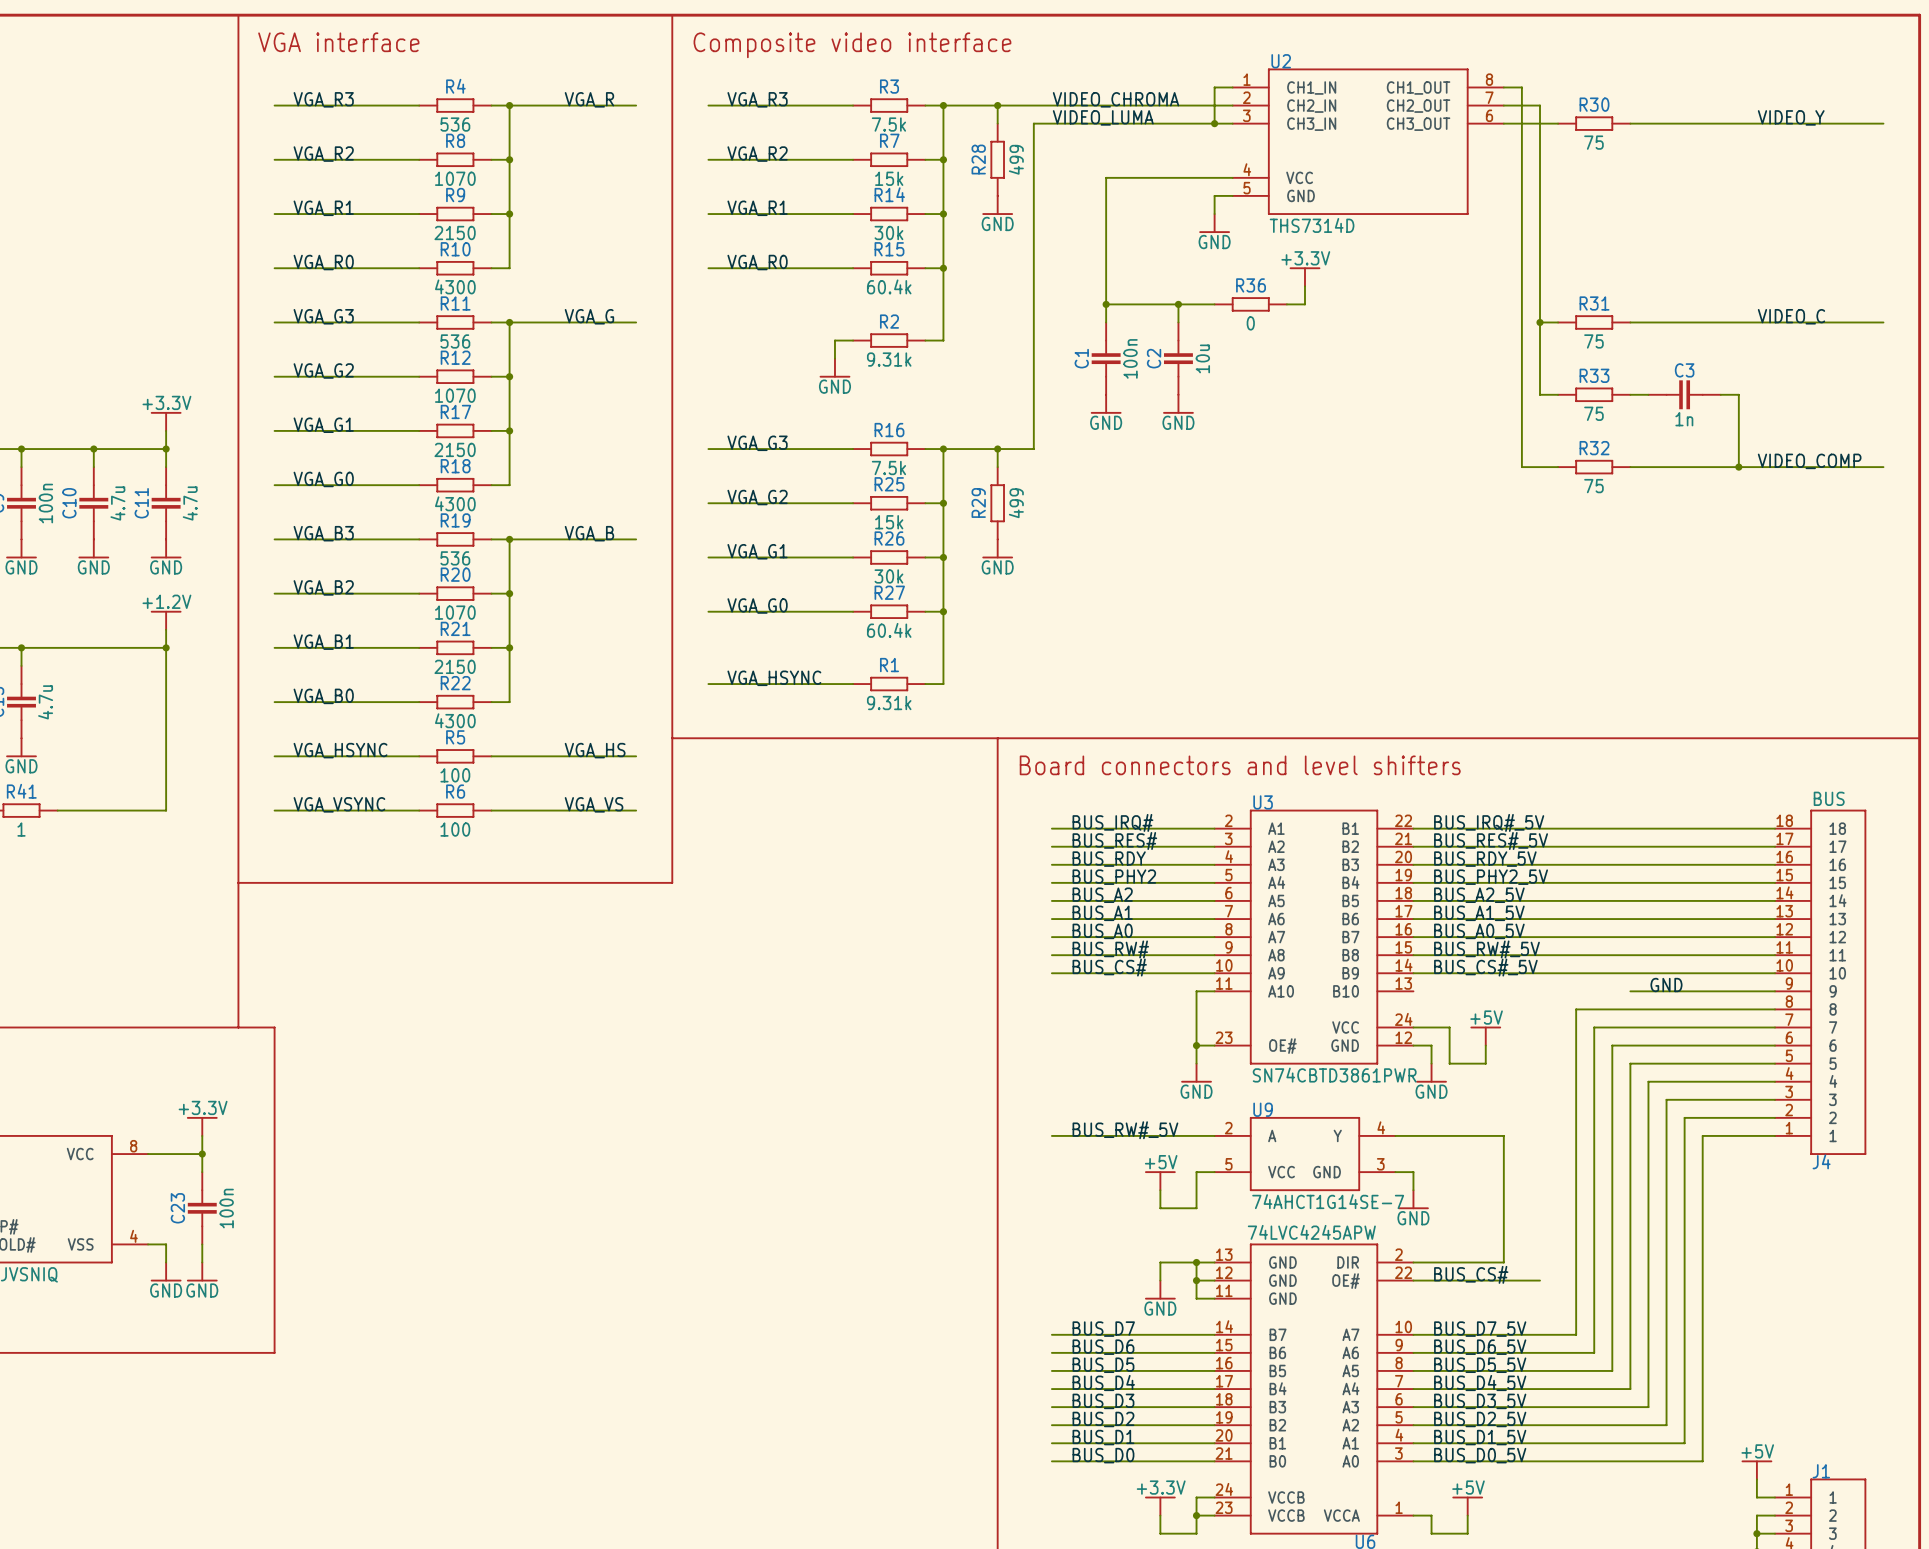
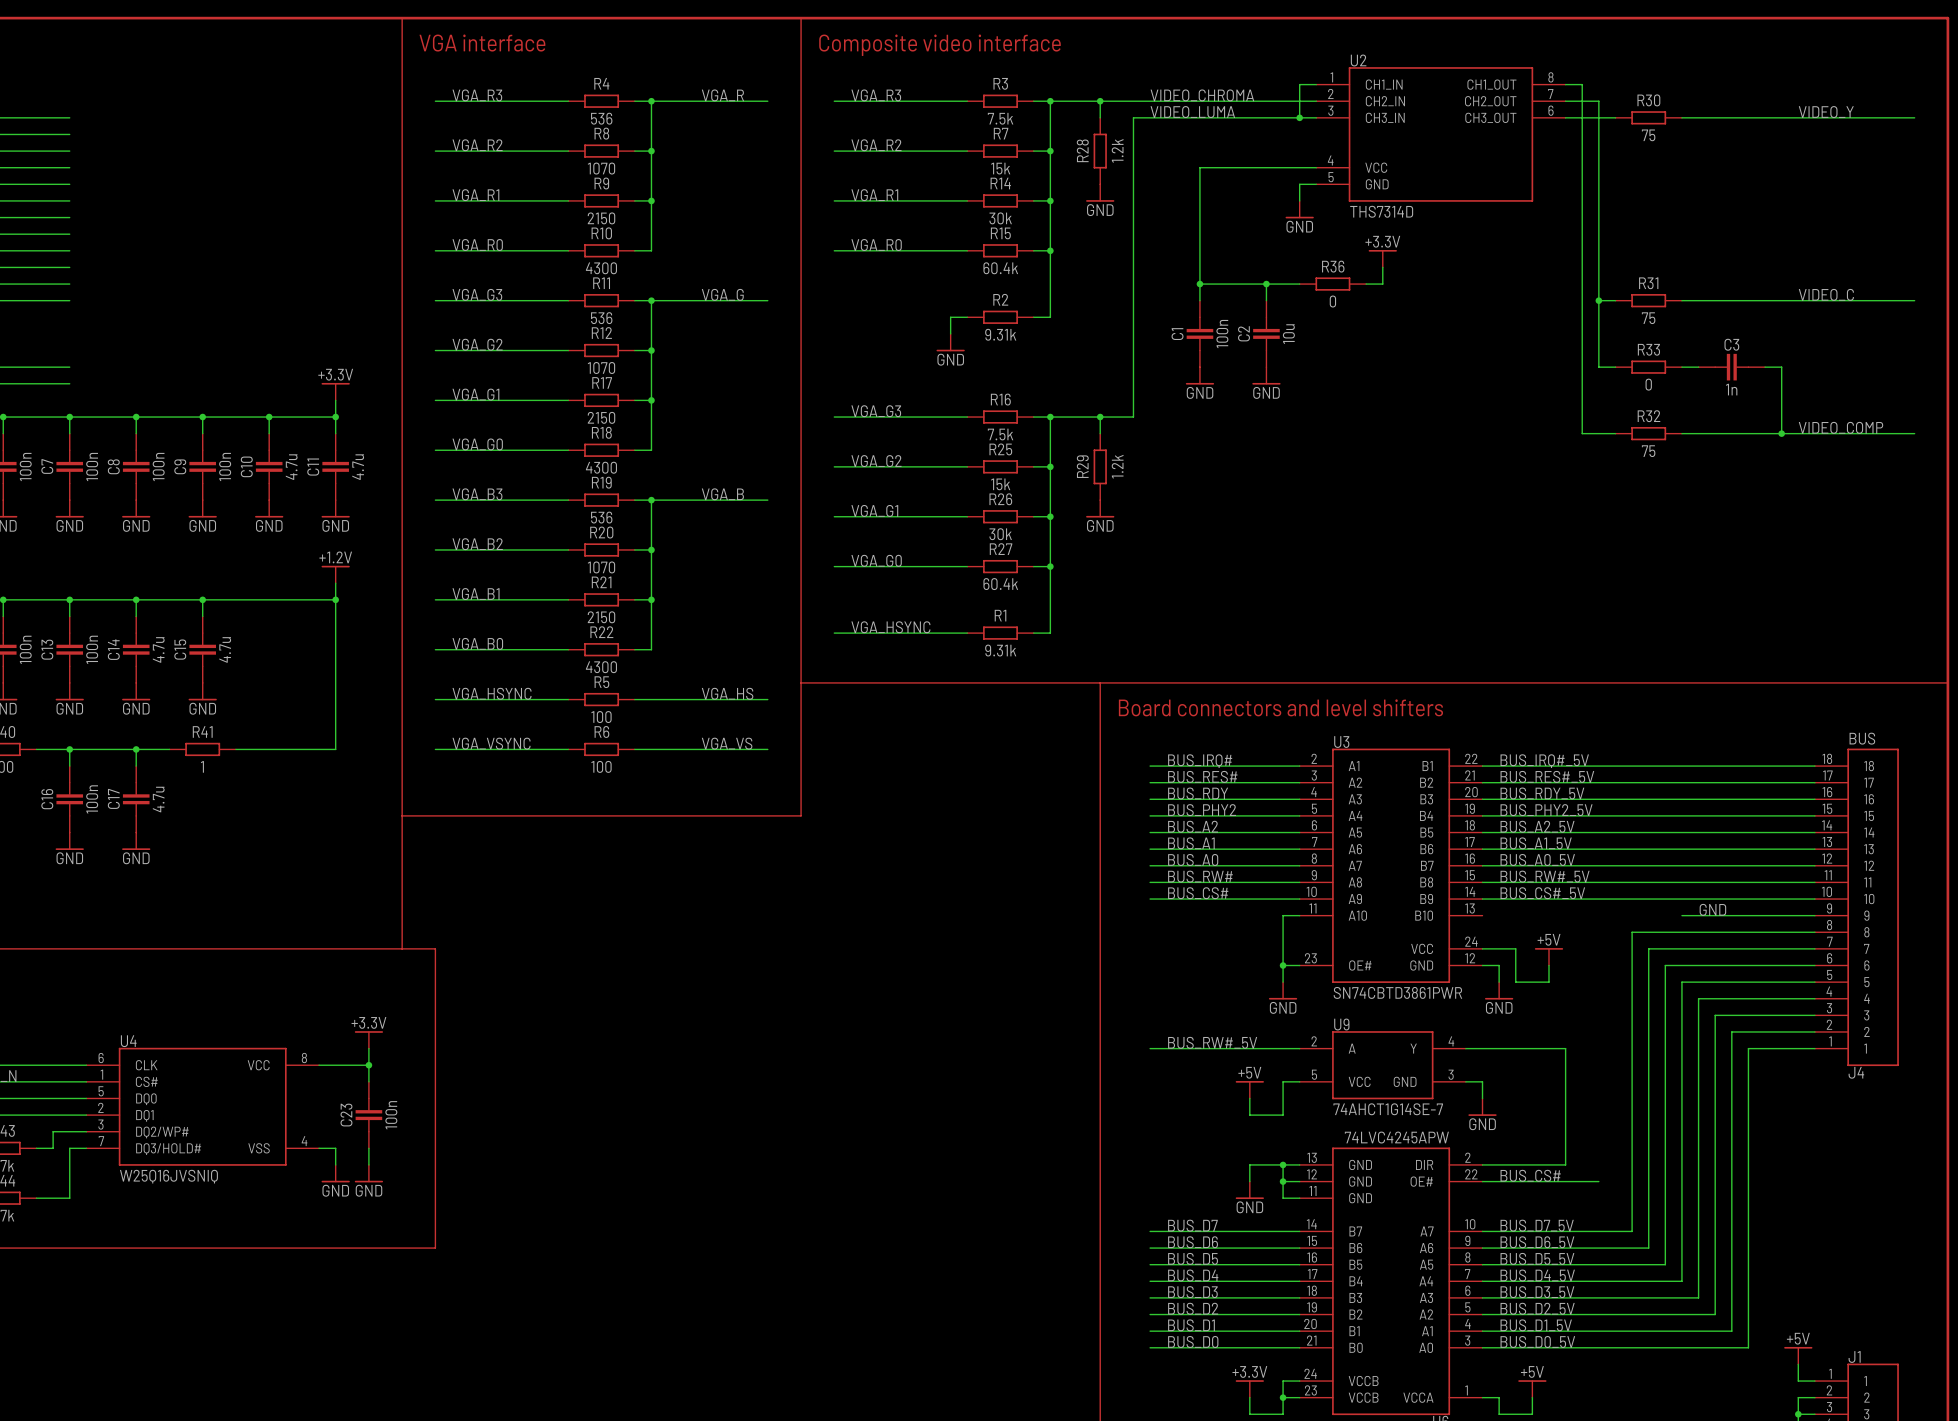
R28 value: 499 (1016, 159) -> 1.2k (1117, 150)
R33 value: 75 (1593, 413) -> 0 (1648, 384)
R29 value: 499 (1016, 503) -> 1.2k (1117, 466)

